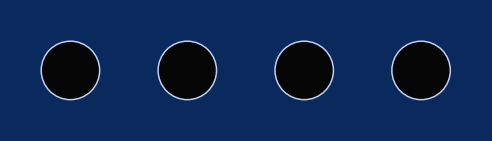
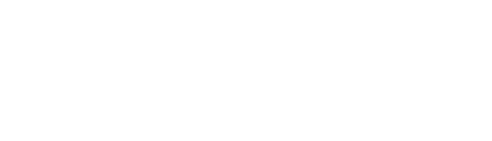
part: (70, 70) -> none
part: (187, 70) -> none
part: (304, 70) -> none
part: (421, 70) -> none

